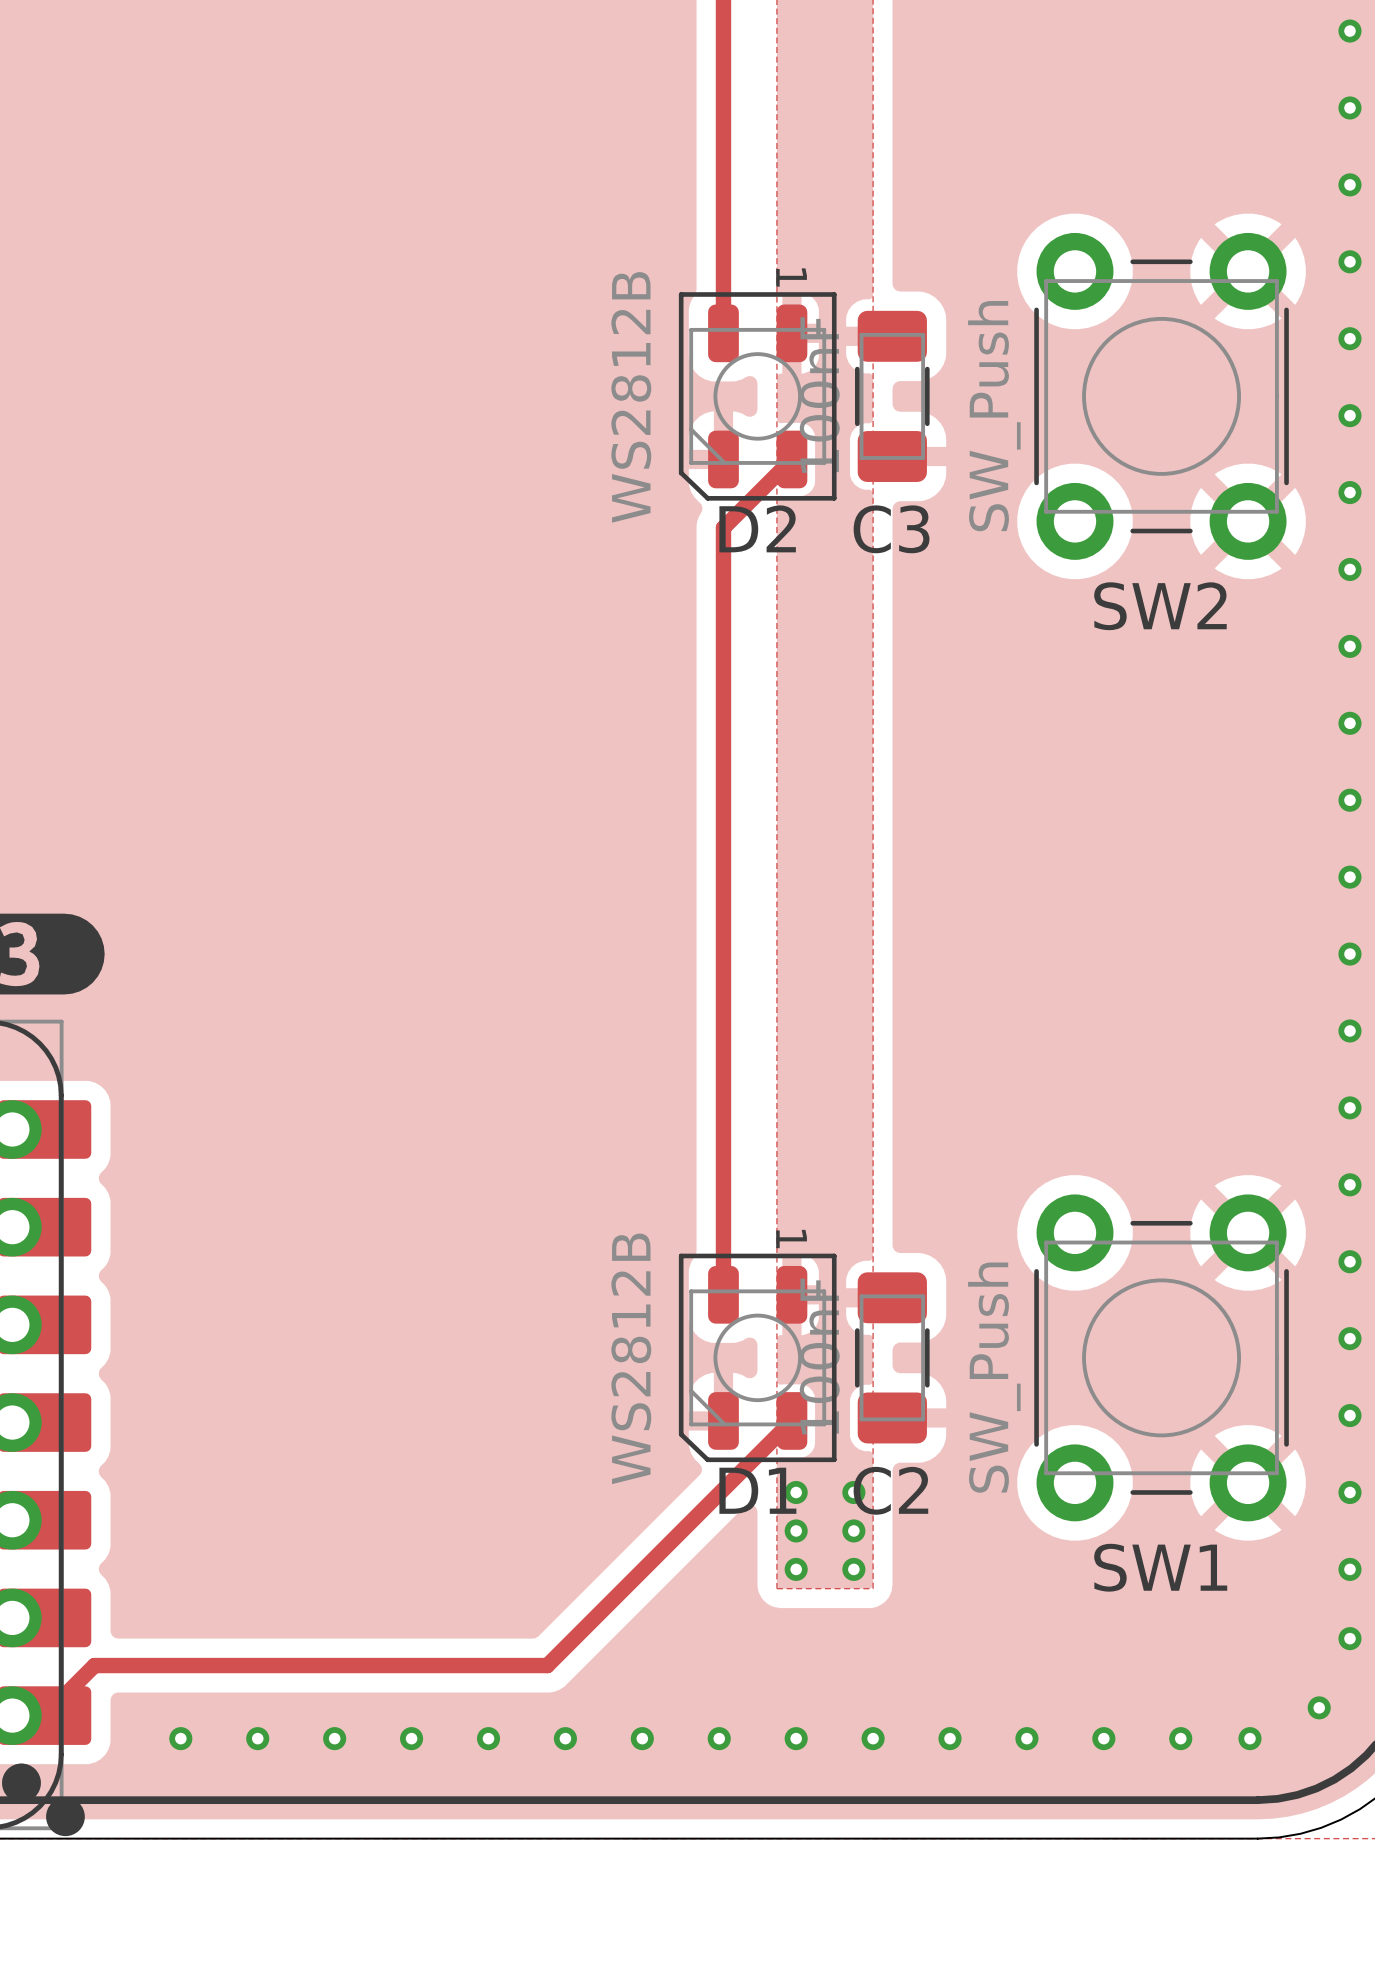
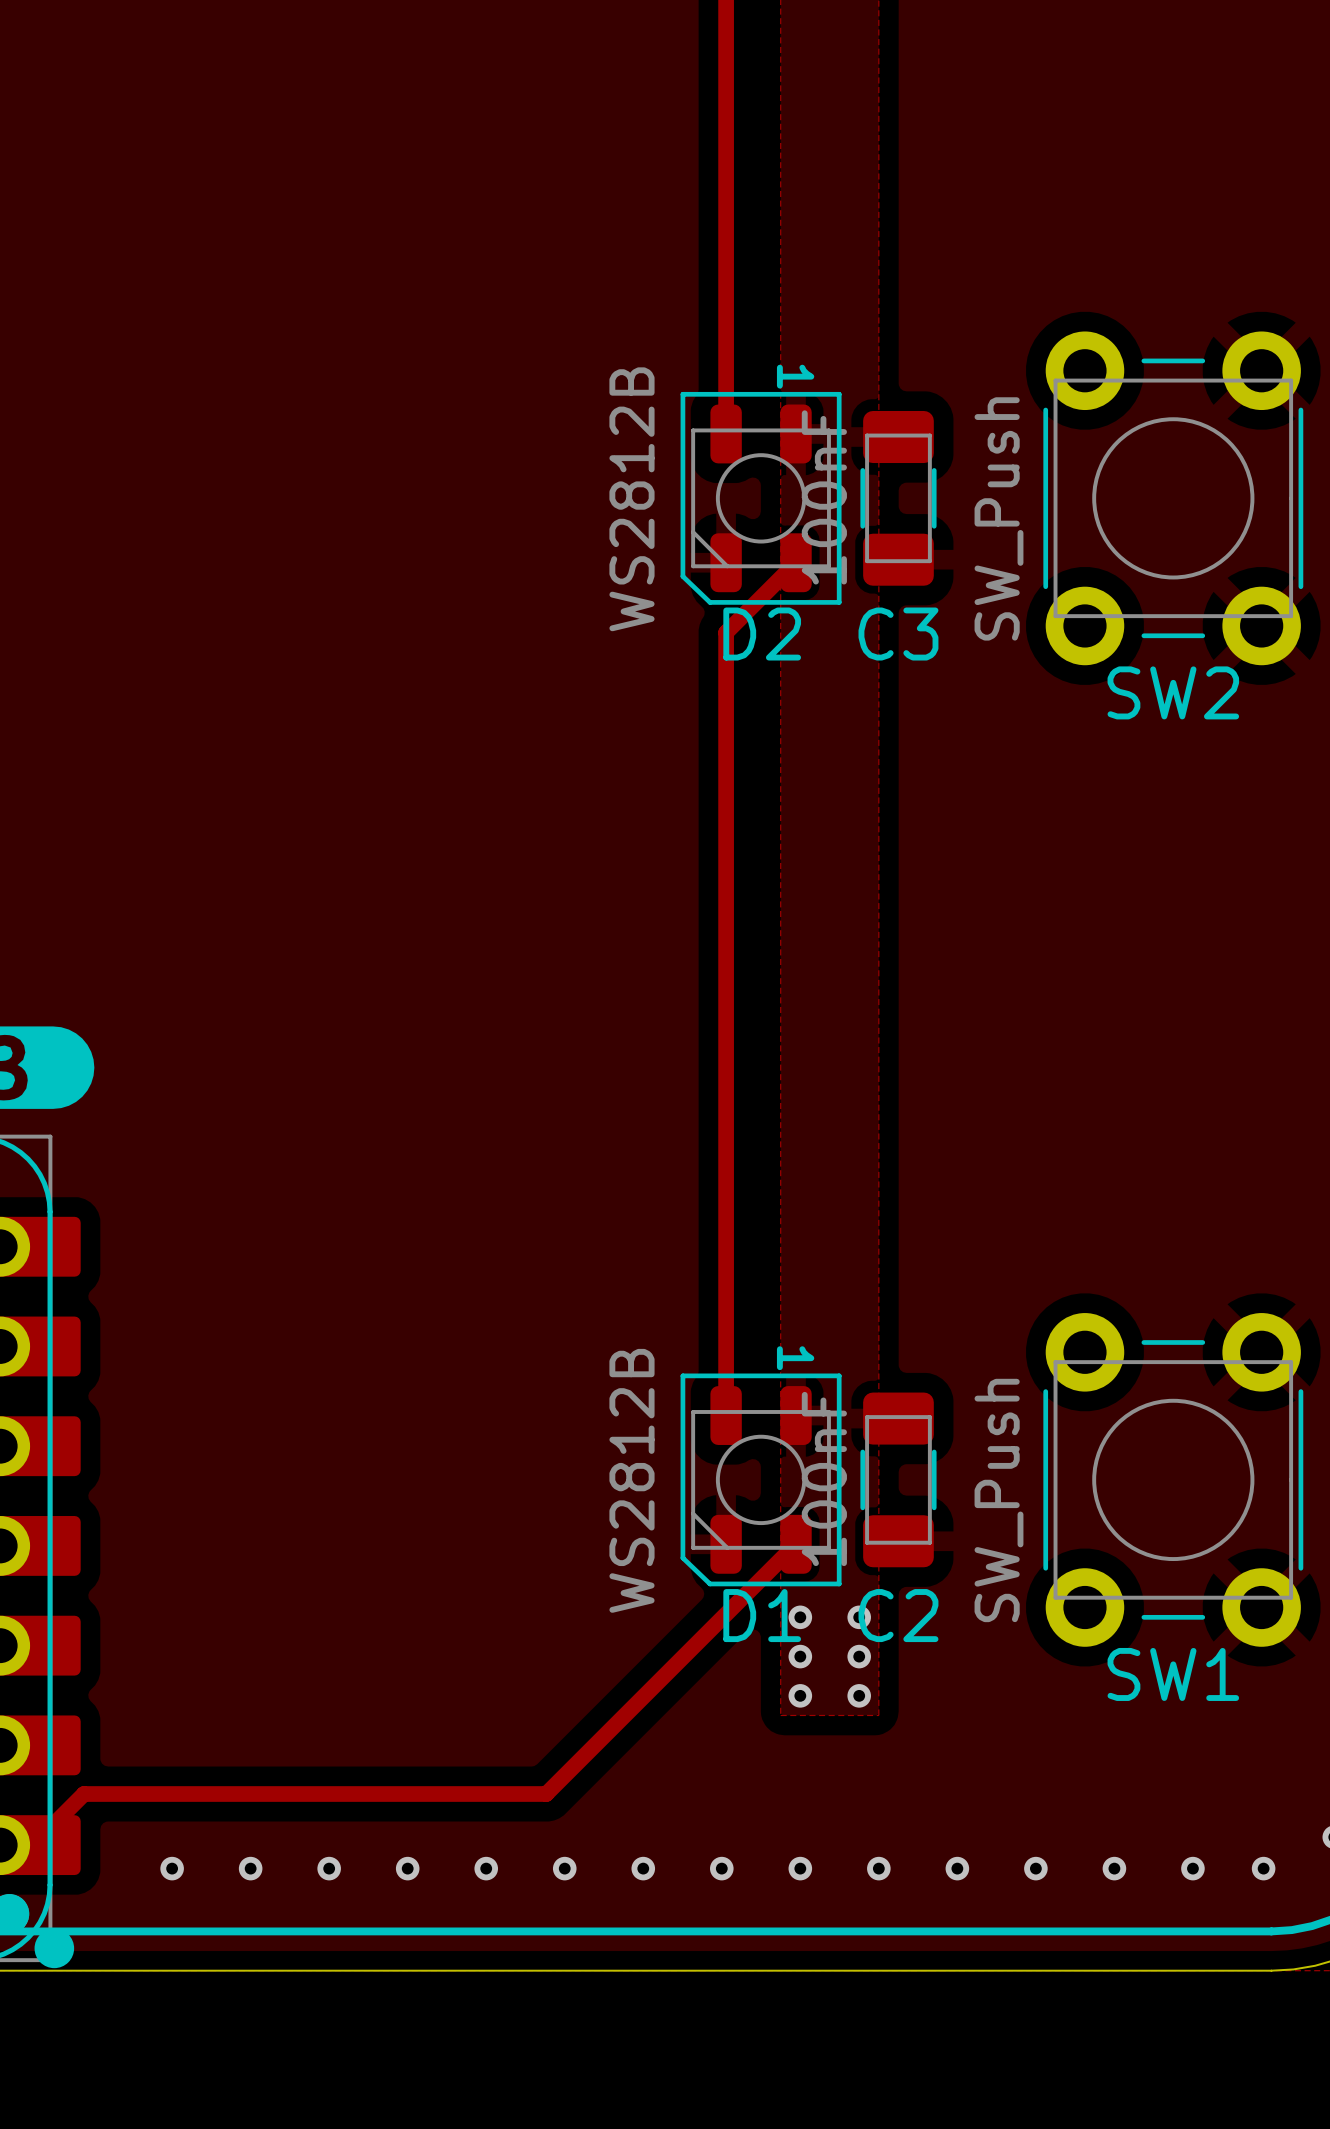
SW2 name position: SW2 (1160, 606) -> SW2 (1173, 692)
SW1 name position: SW1 (1160, 1567) -> SW1 (1173, 1674)

